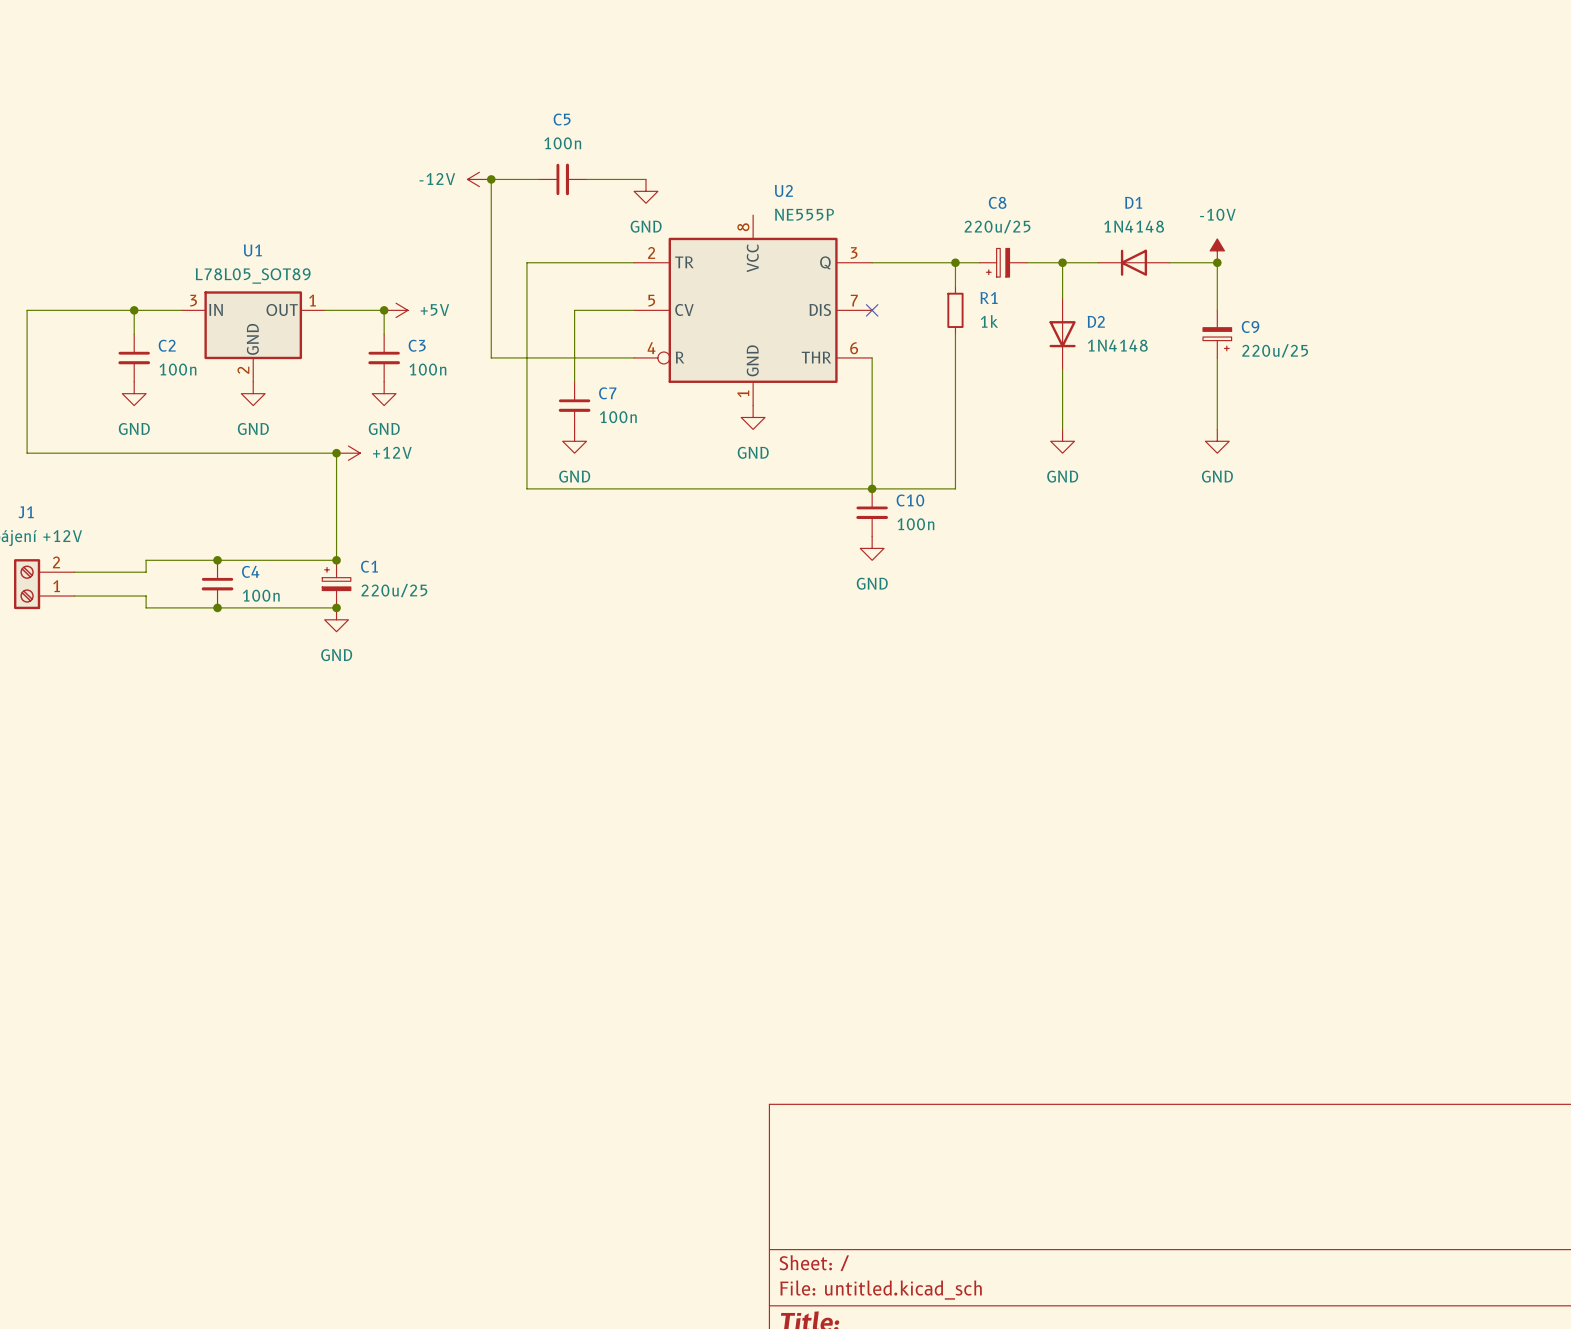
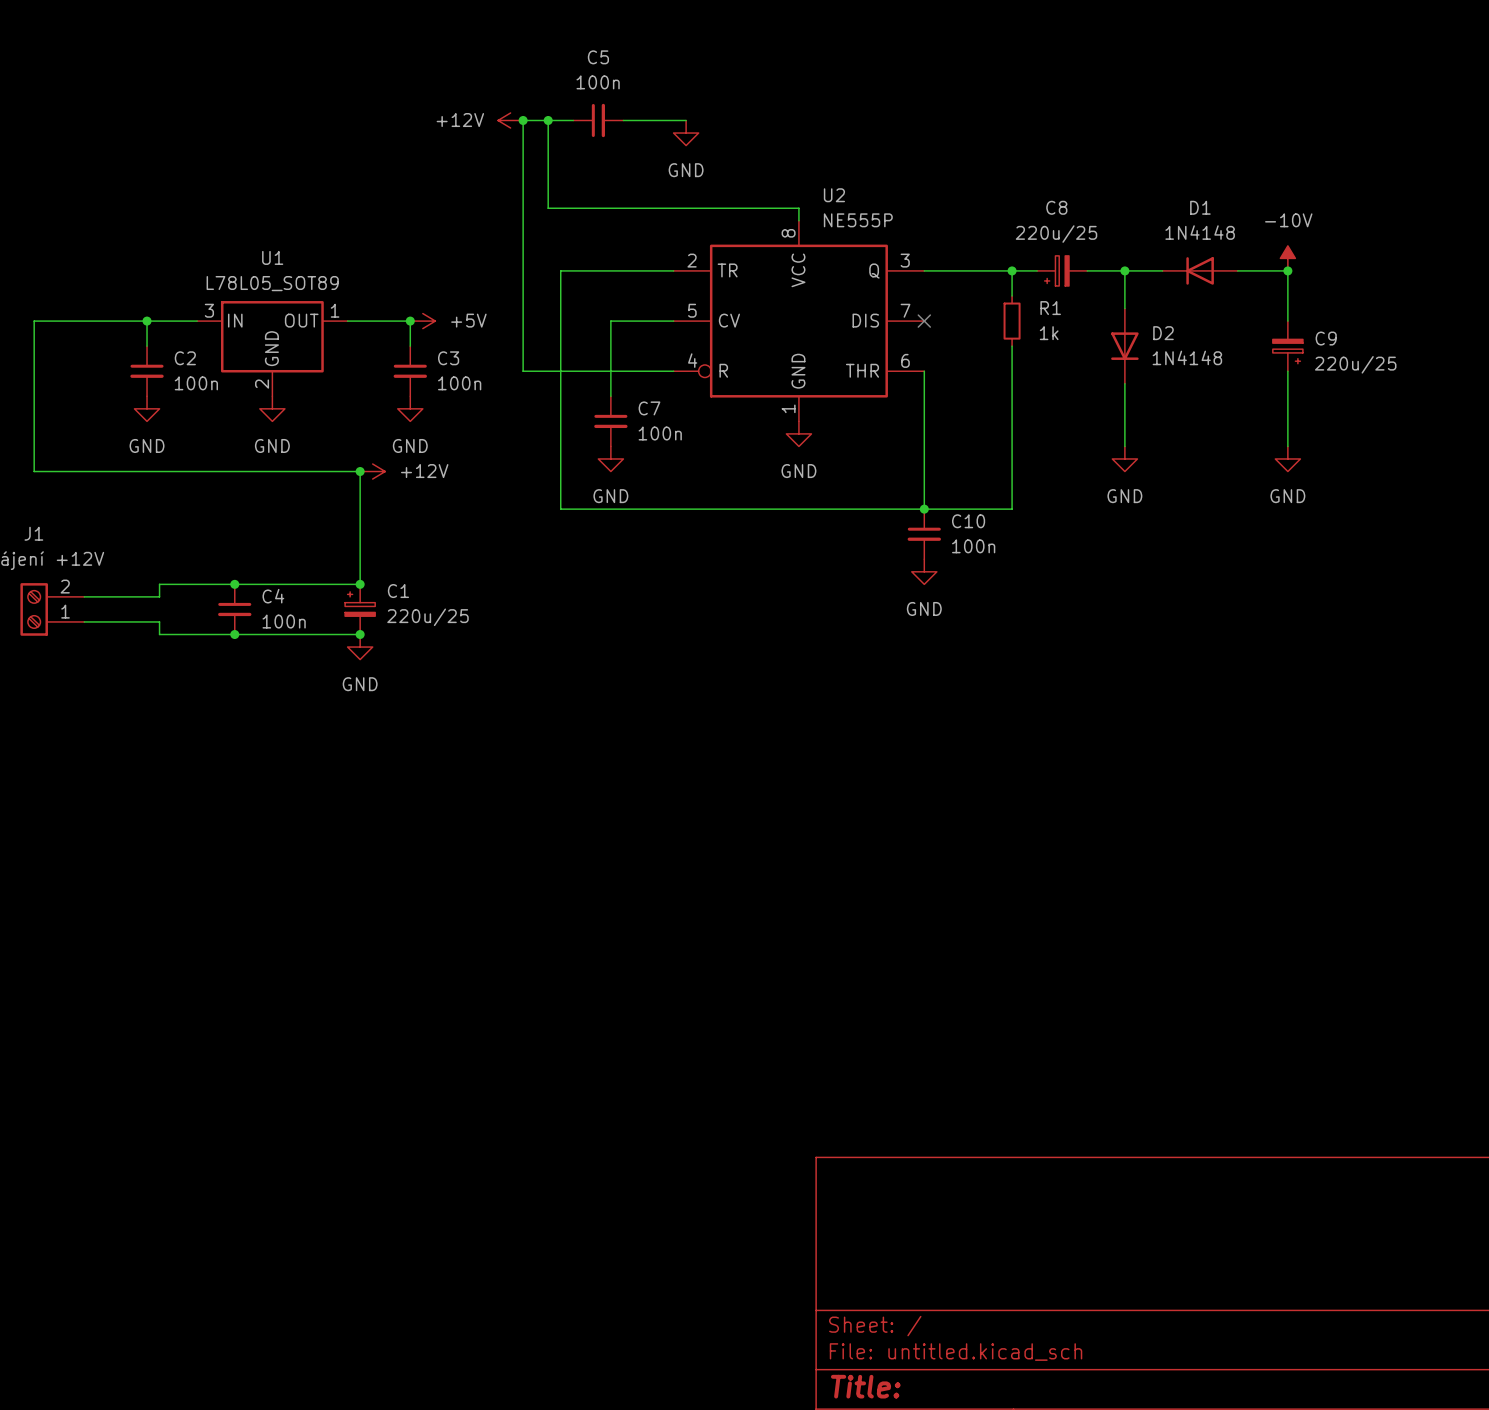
power symbol: none -> +12V (510, 120)
junction: none -> (523, 120)
wire: none -> (548, 120) (548, 208) (798, 208) (798, 220)
junction: none -> (548, 120)
power symbol: -12V (479, 179) -> none
wire: (491, 179) (538, 179) -> (523, 183) (523, 120) (573, 120)
junction: (491, 179) -> none
C5 position: (562, 179) -> (598, 120)
wire: (586, 179) (646, 179) -> (623, 120) (686, 120)
power symbol position: GND (646, 191) -> GND (686, 133)

